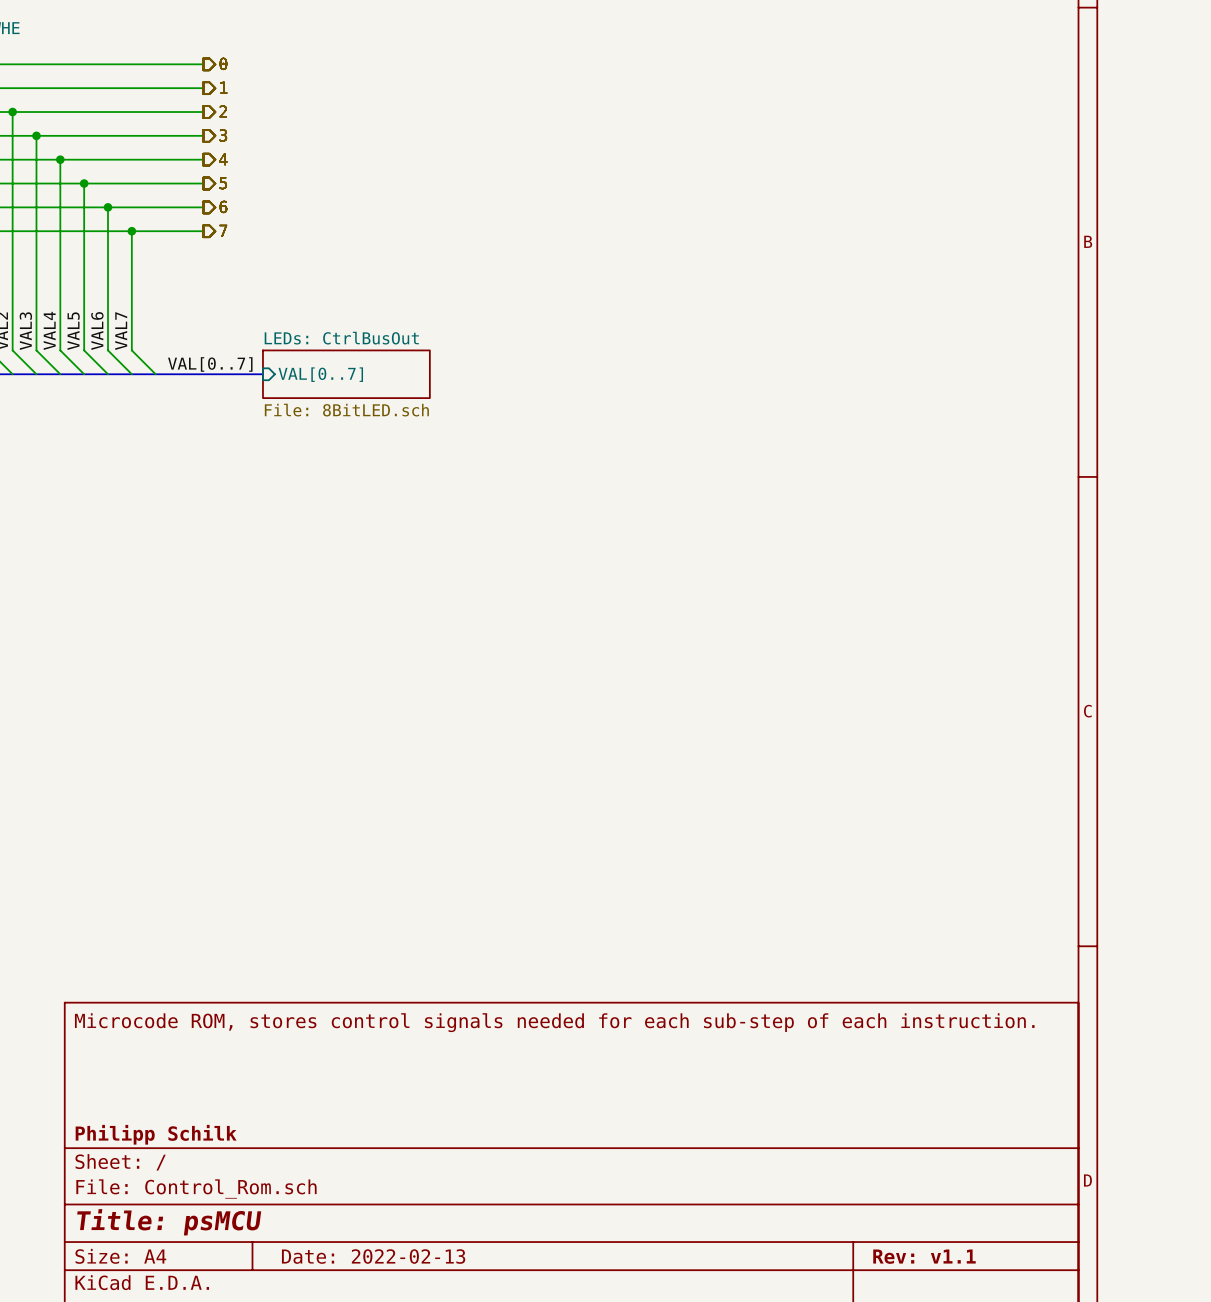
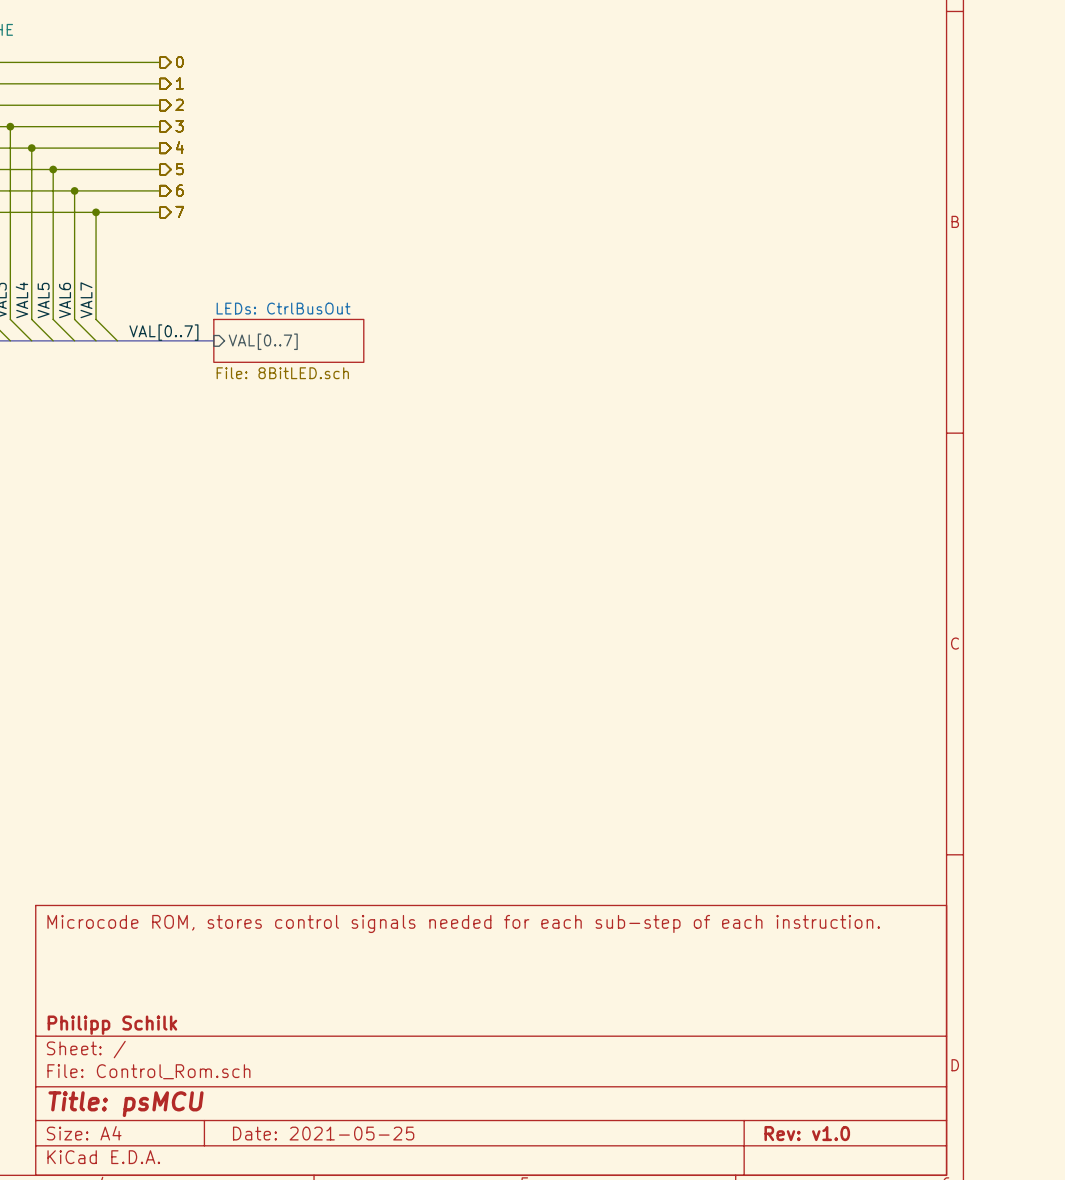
title block: Date: 2022-02-13 (373, 1256) -> Date: 2021-05-25 (323, 1133)
title block: Rev: v1.1 (924, 1256) -> Rev: v1.0 (807, 1133)

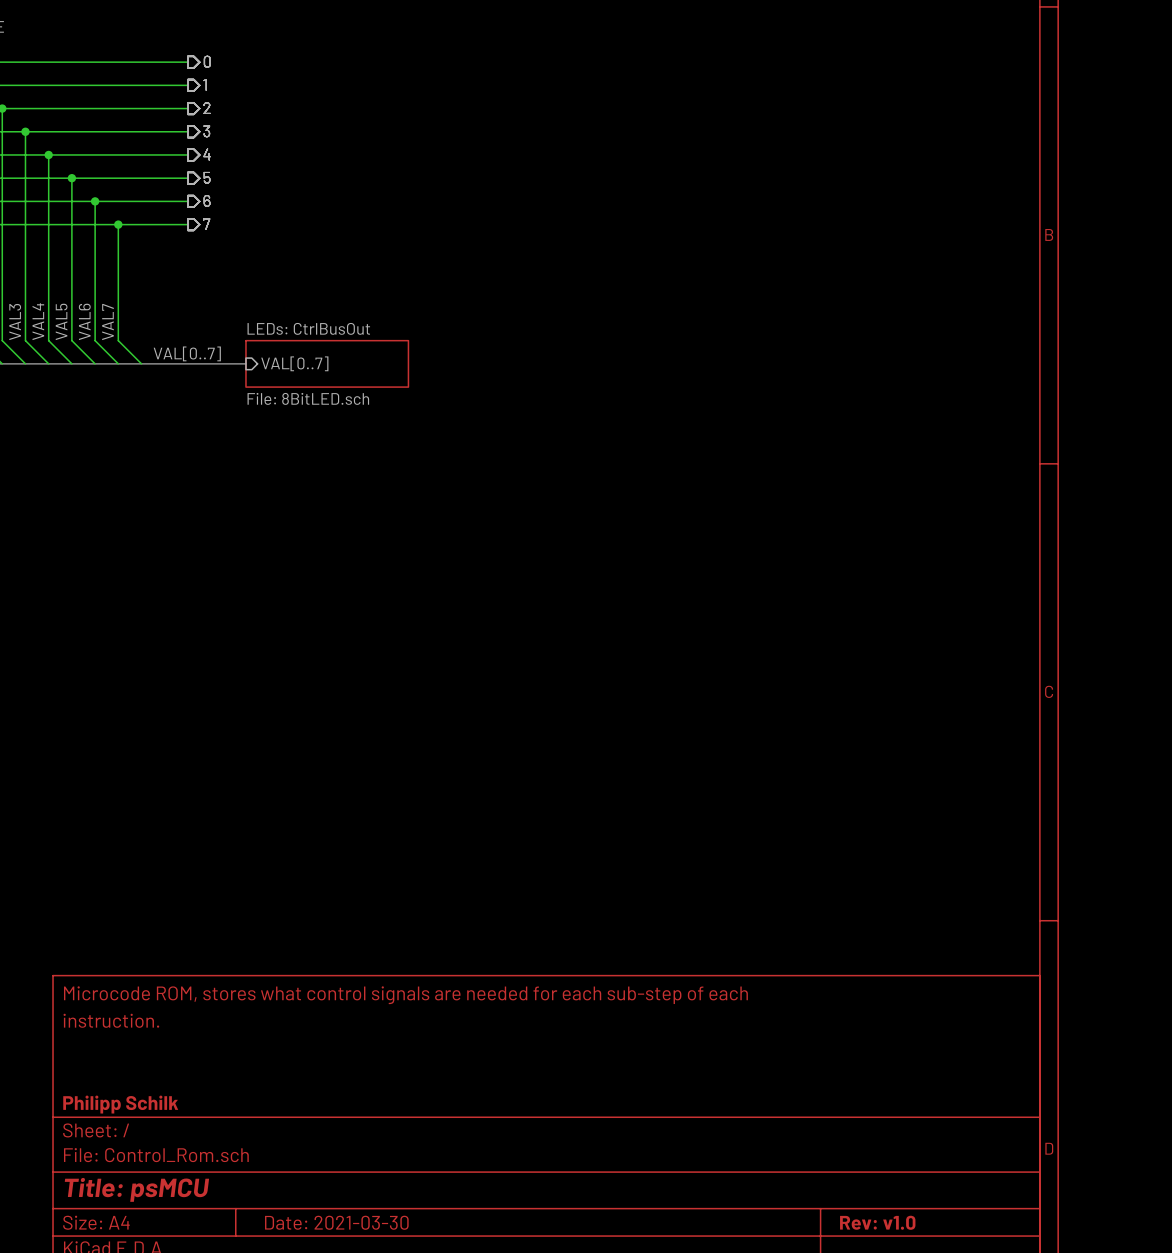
title block: Microcode ROM, stores control signals needed for each sub-step of each instruction. (463, 923) -> Microcode ROM, stores what control signals are needed for each sub-step of each (405, 995)
title block: none -> instruction. (111, 1020)
title block: Date: 2021-05-25 (323, 1133) -> Date: 2021-03-30 (336, 1222)

